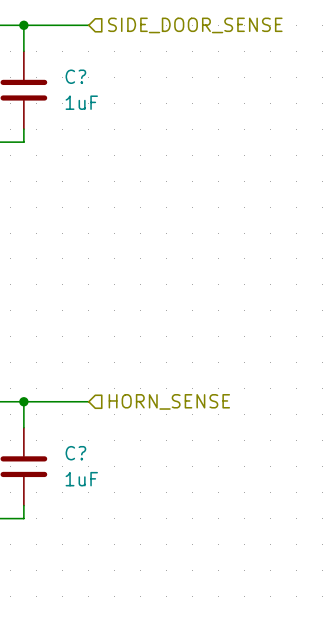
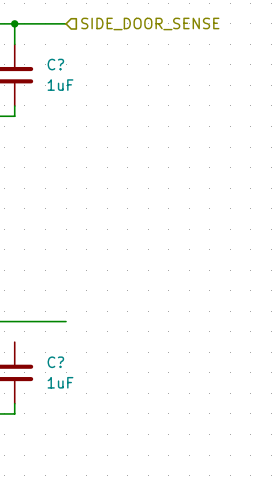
wire: (23, 401) (23, 427) -> none
junction: (23, 401) -> none
hierarchical label: HORN_SENSE (169, 401) -> none

